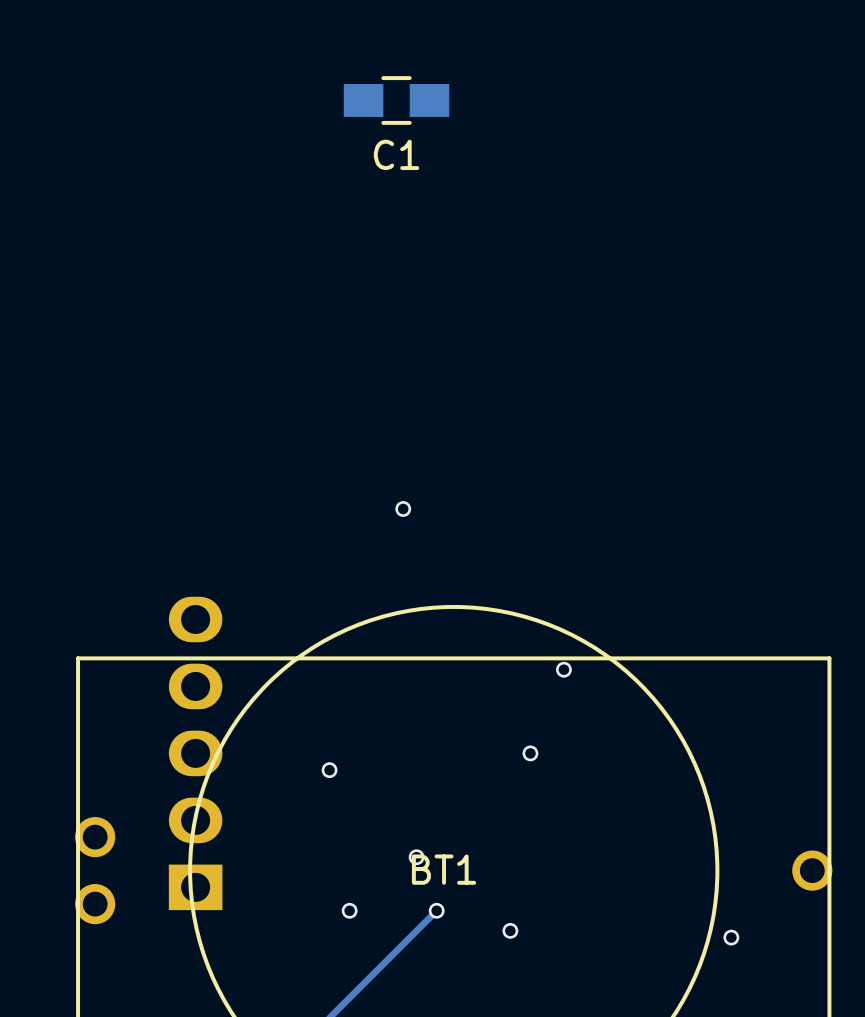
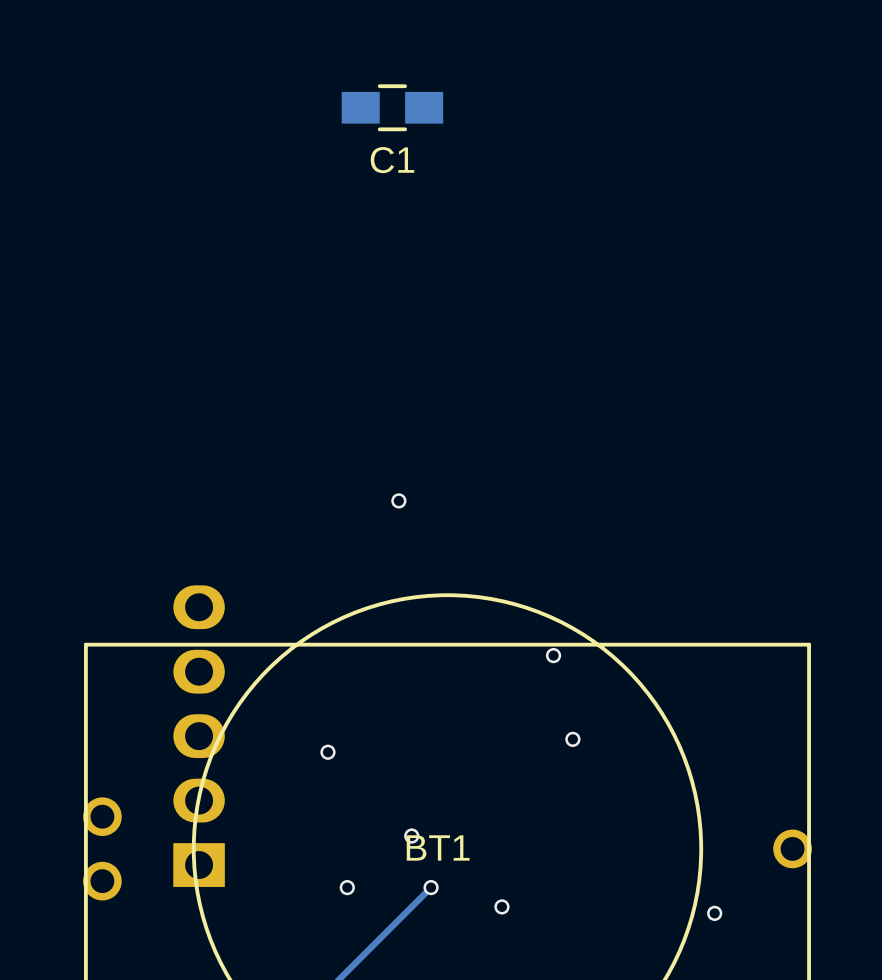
via position: (530, 753) -> (572, 739)

